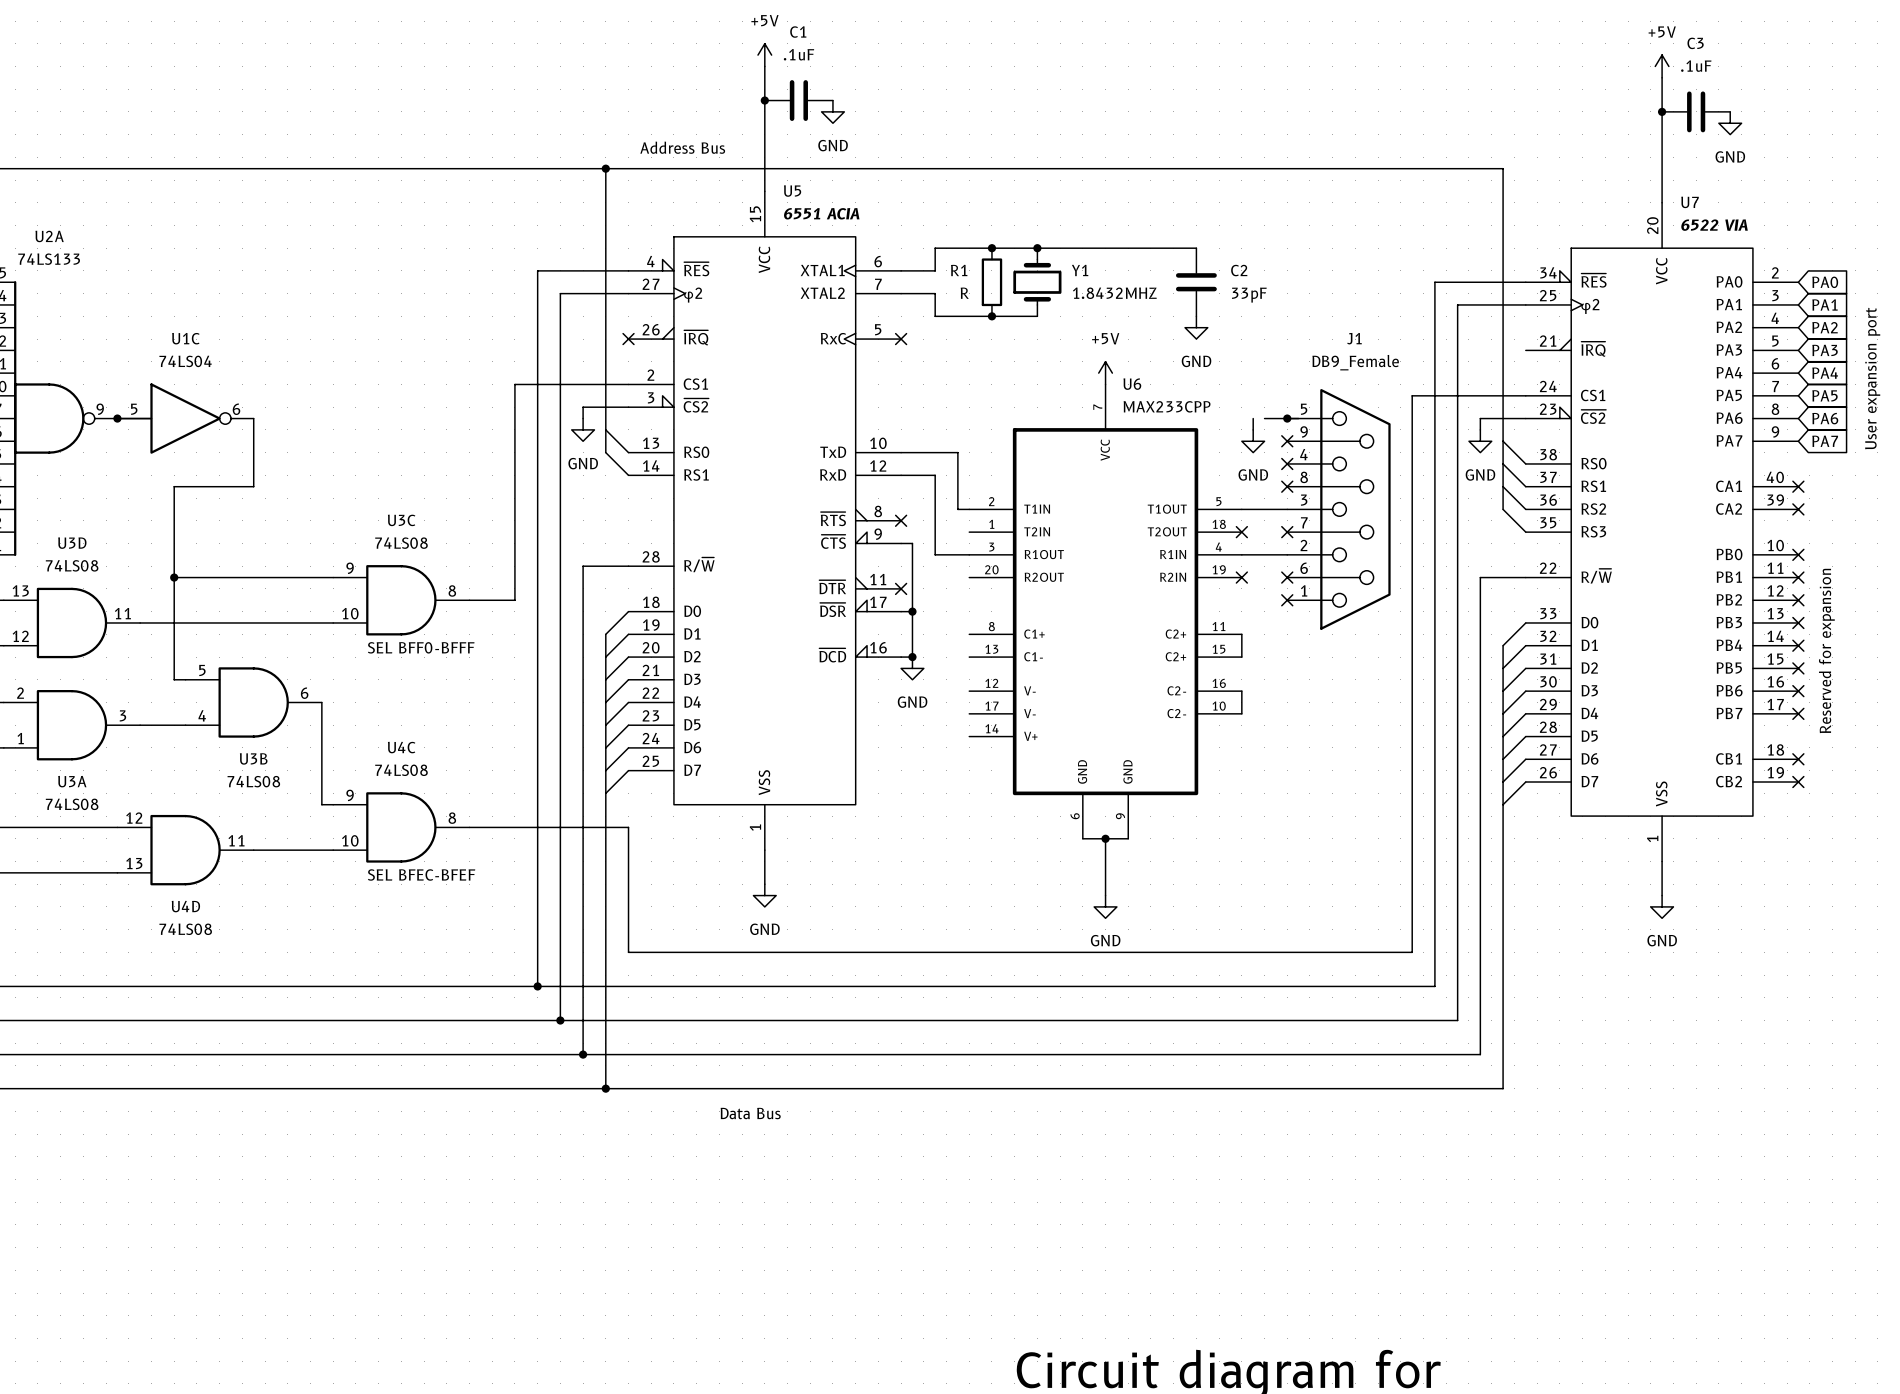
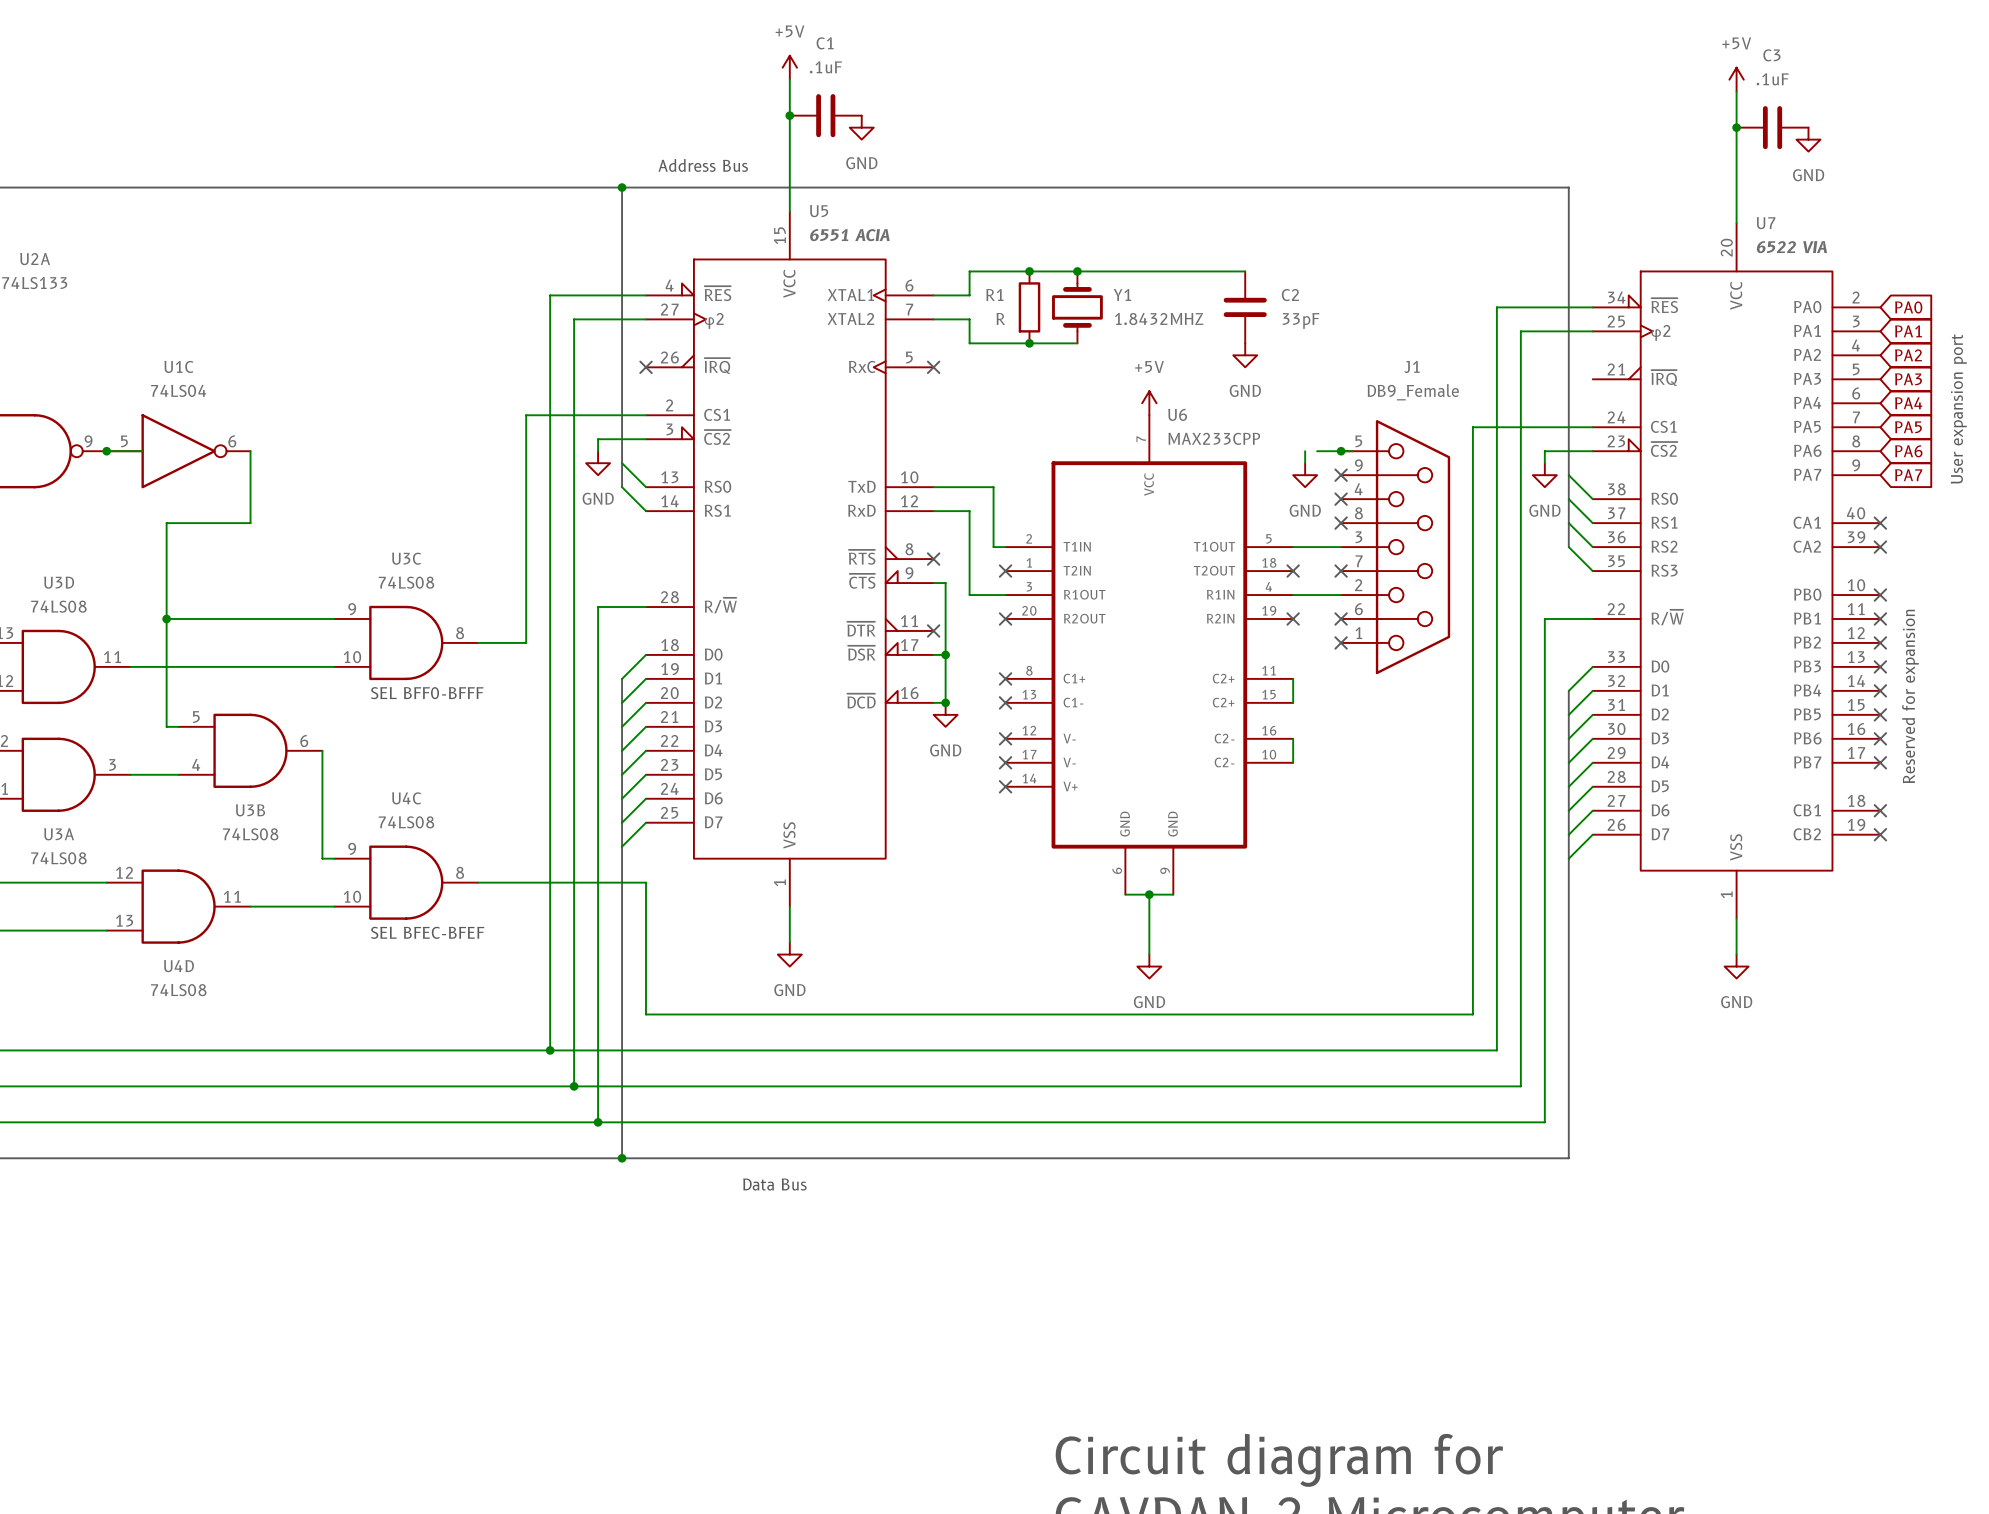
no-connect mark: none -> (1005, 571)
no-connect mark: none -> (1005, 618)
no-connect mark: none -> (1005, 678)
no-connect mark: none -> (1005, 702)
no-connect mark: none -> (1005, 738)
no-connect mark: none -> (1005, 762)
no-connect mark: none -> (1005, 786)

